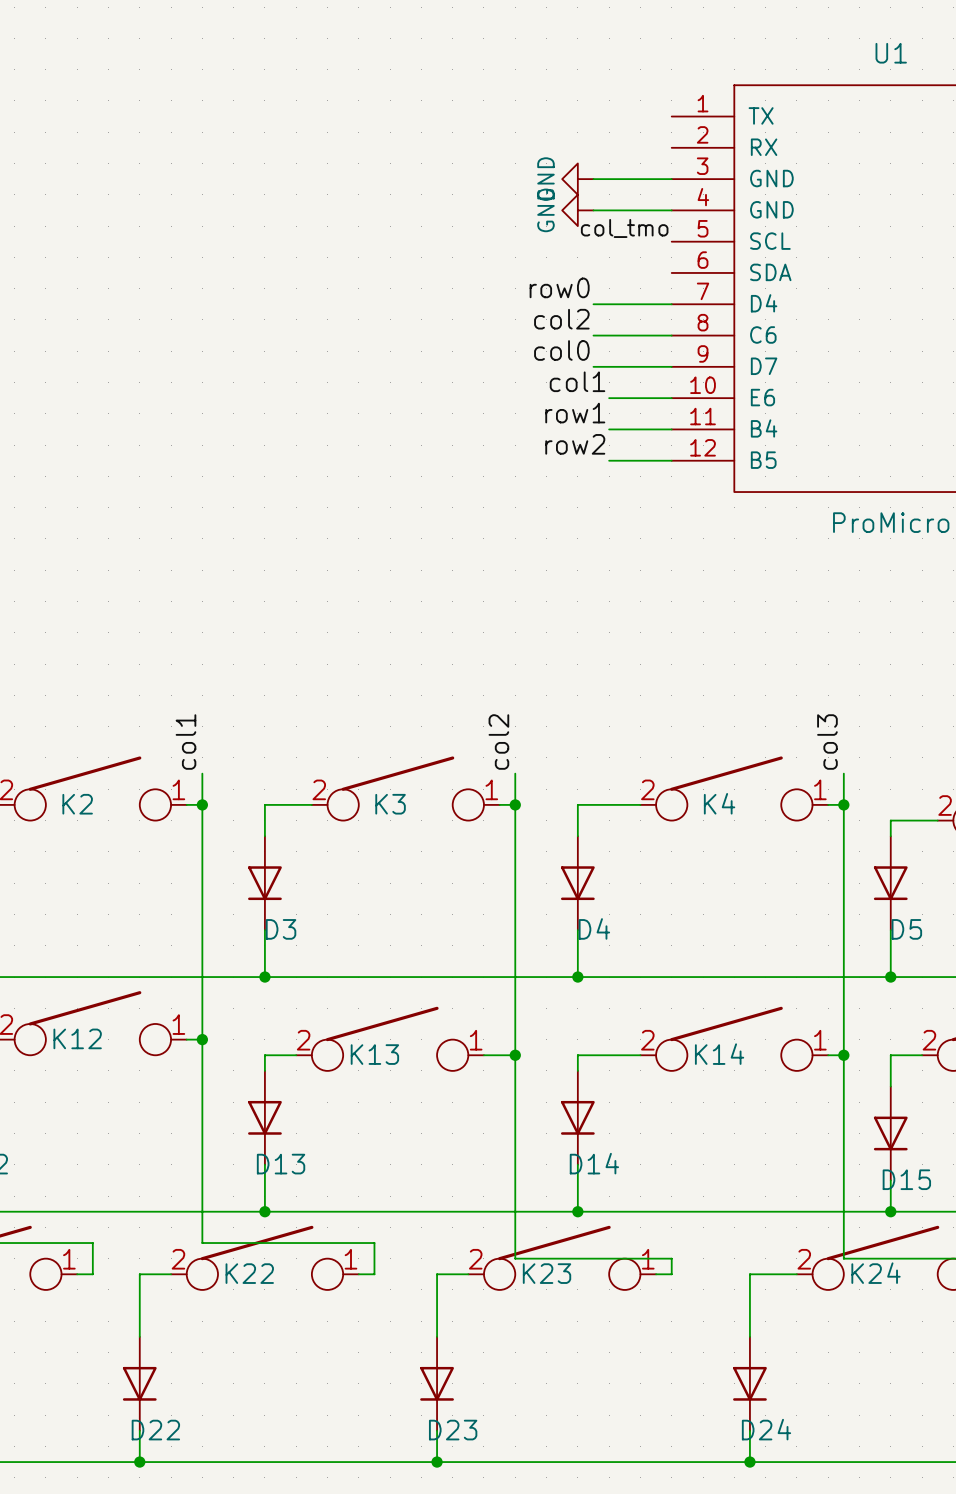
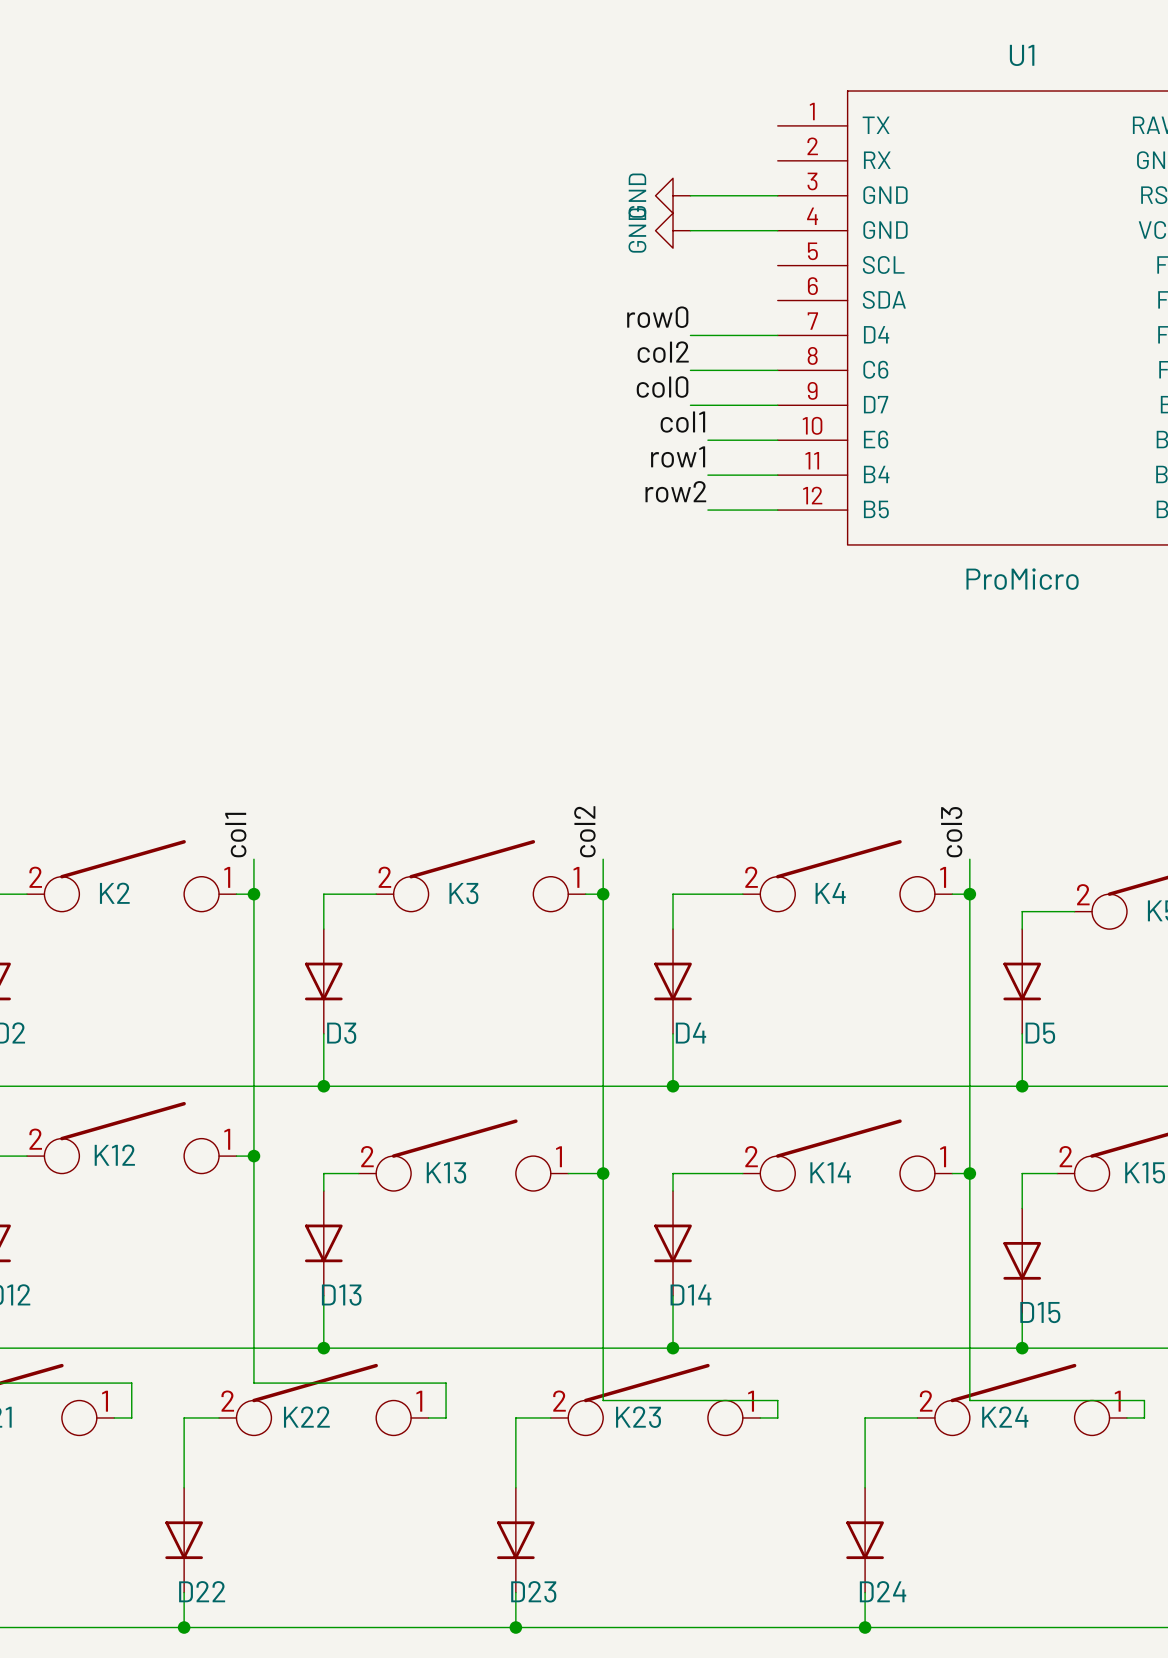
label: col_tmo (624, 228) -> none

